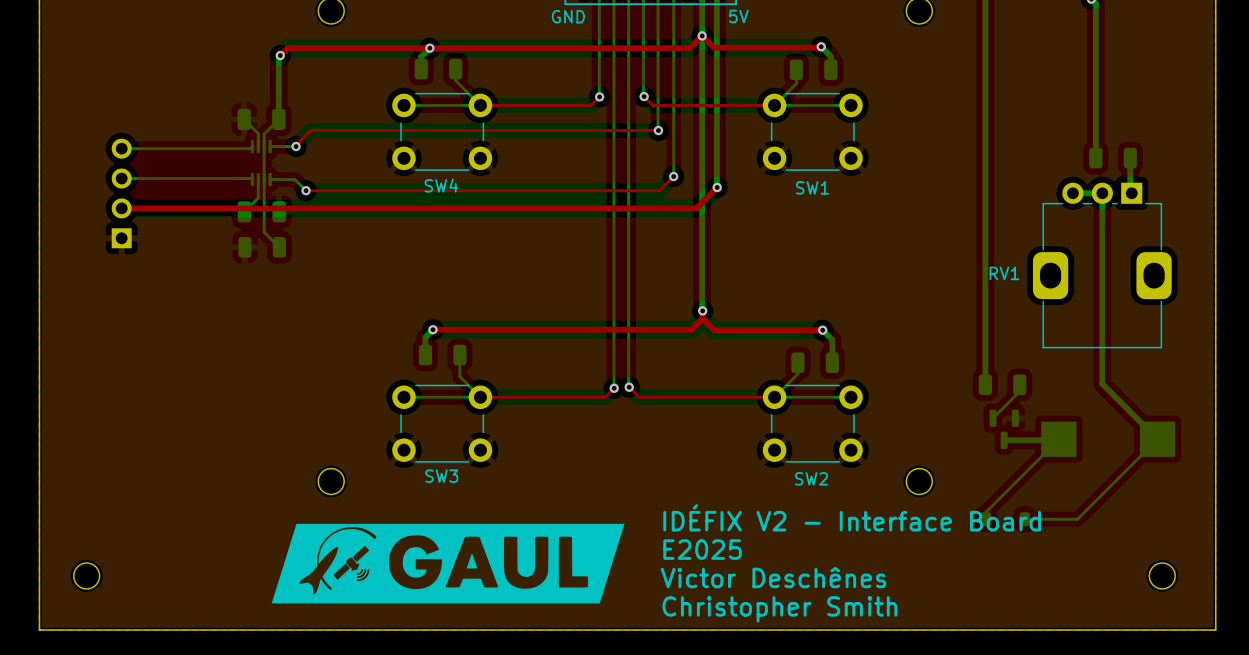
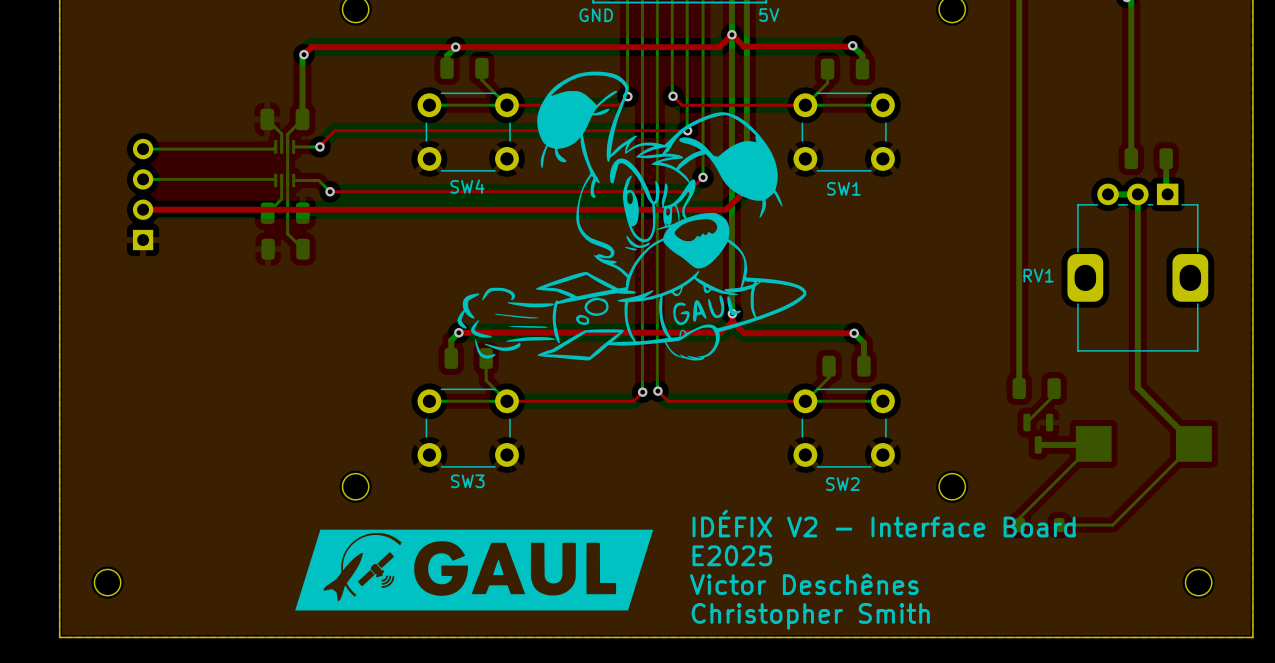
drawing: none -> [457, 71, 807, 361]

